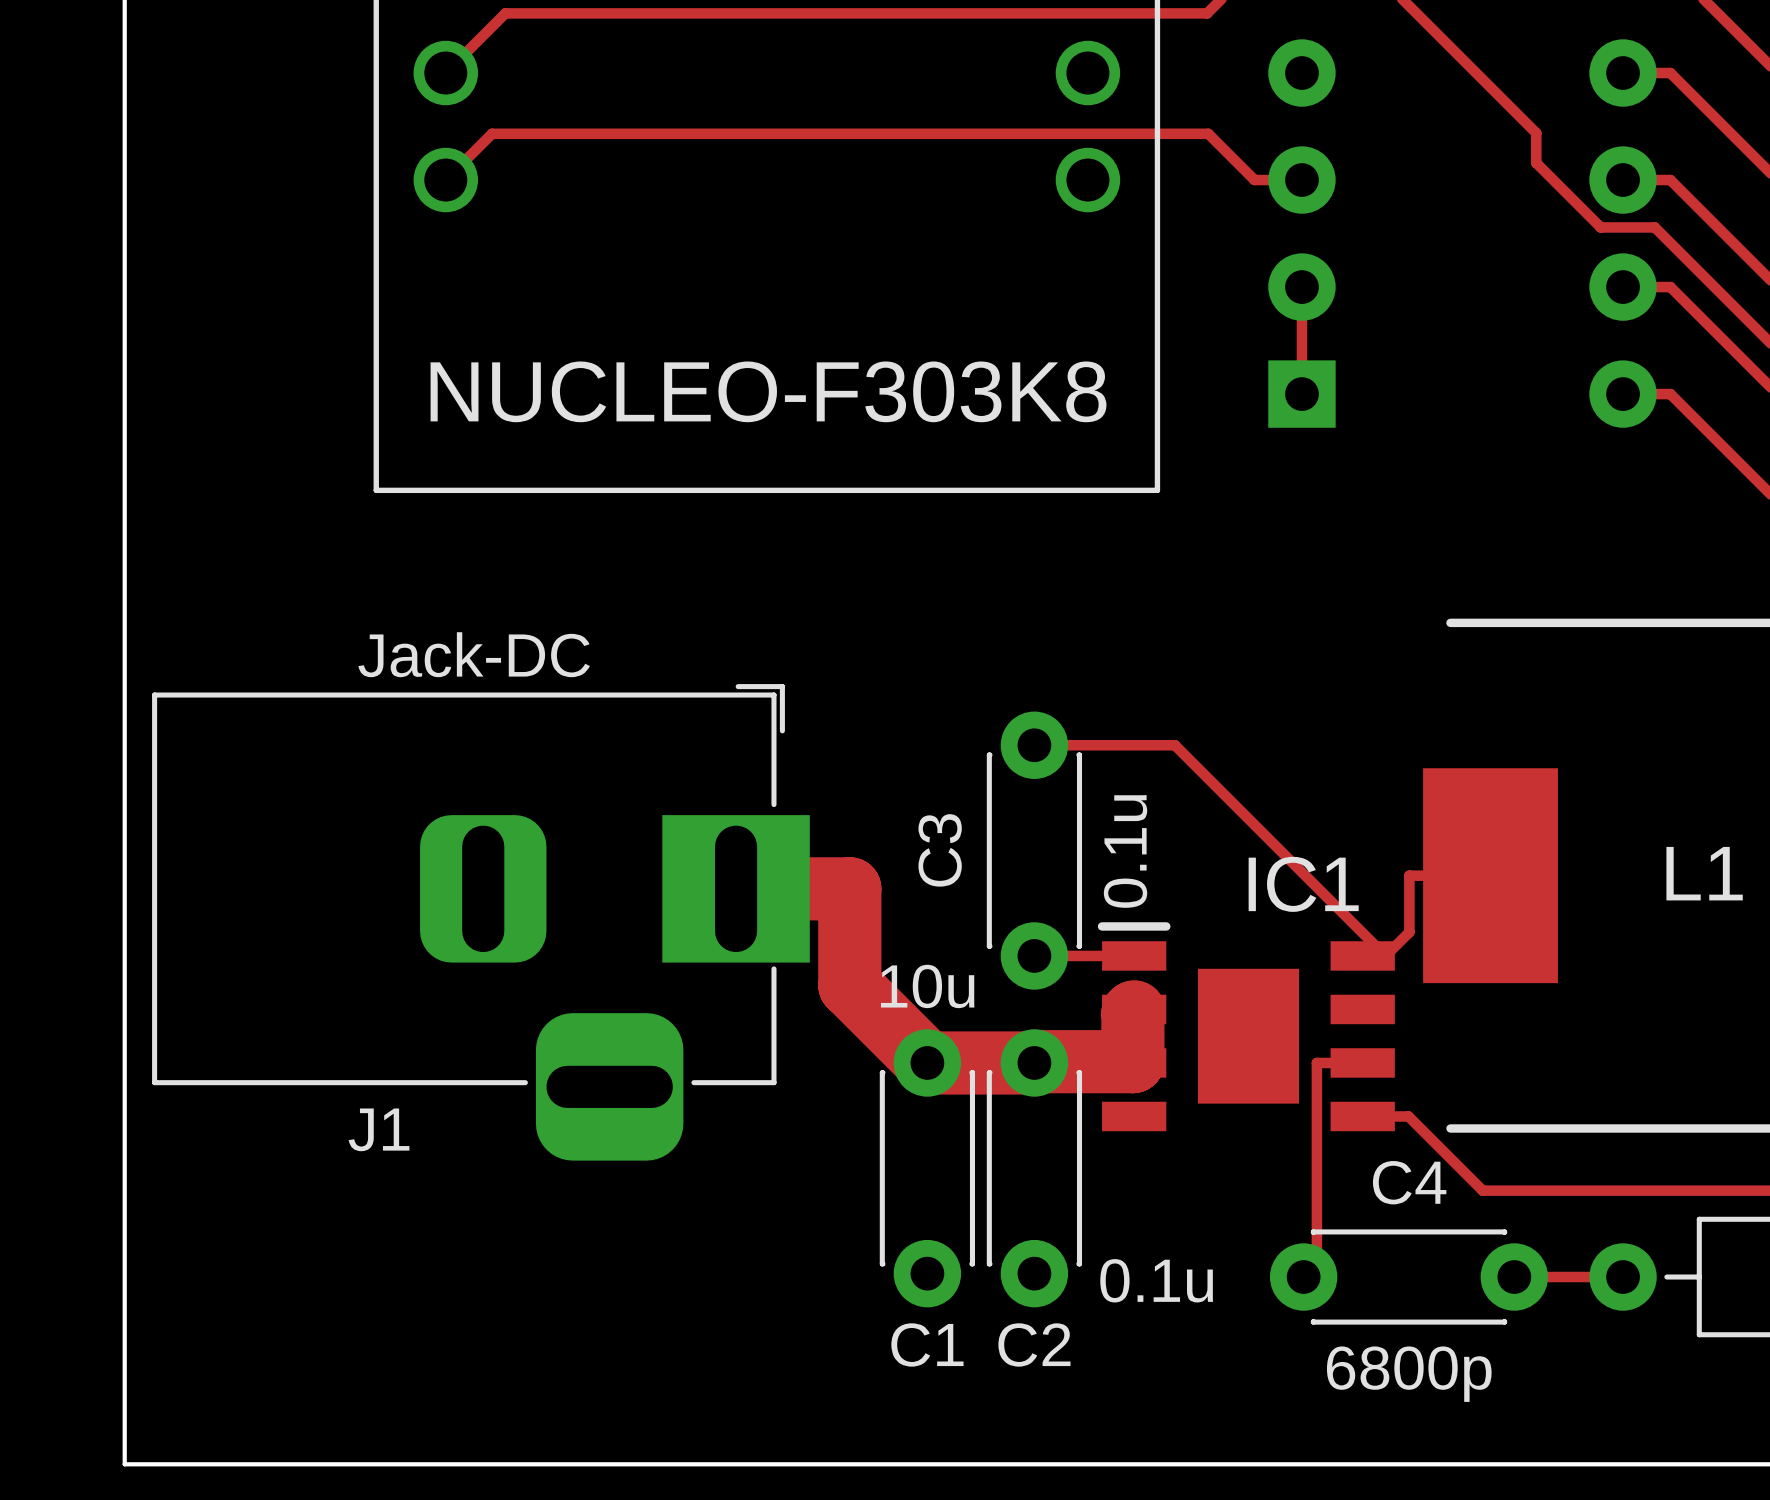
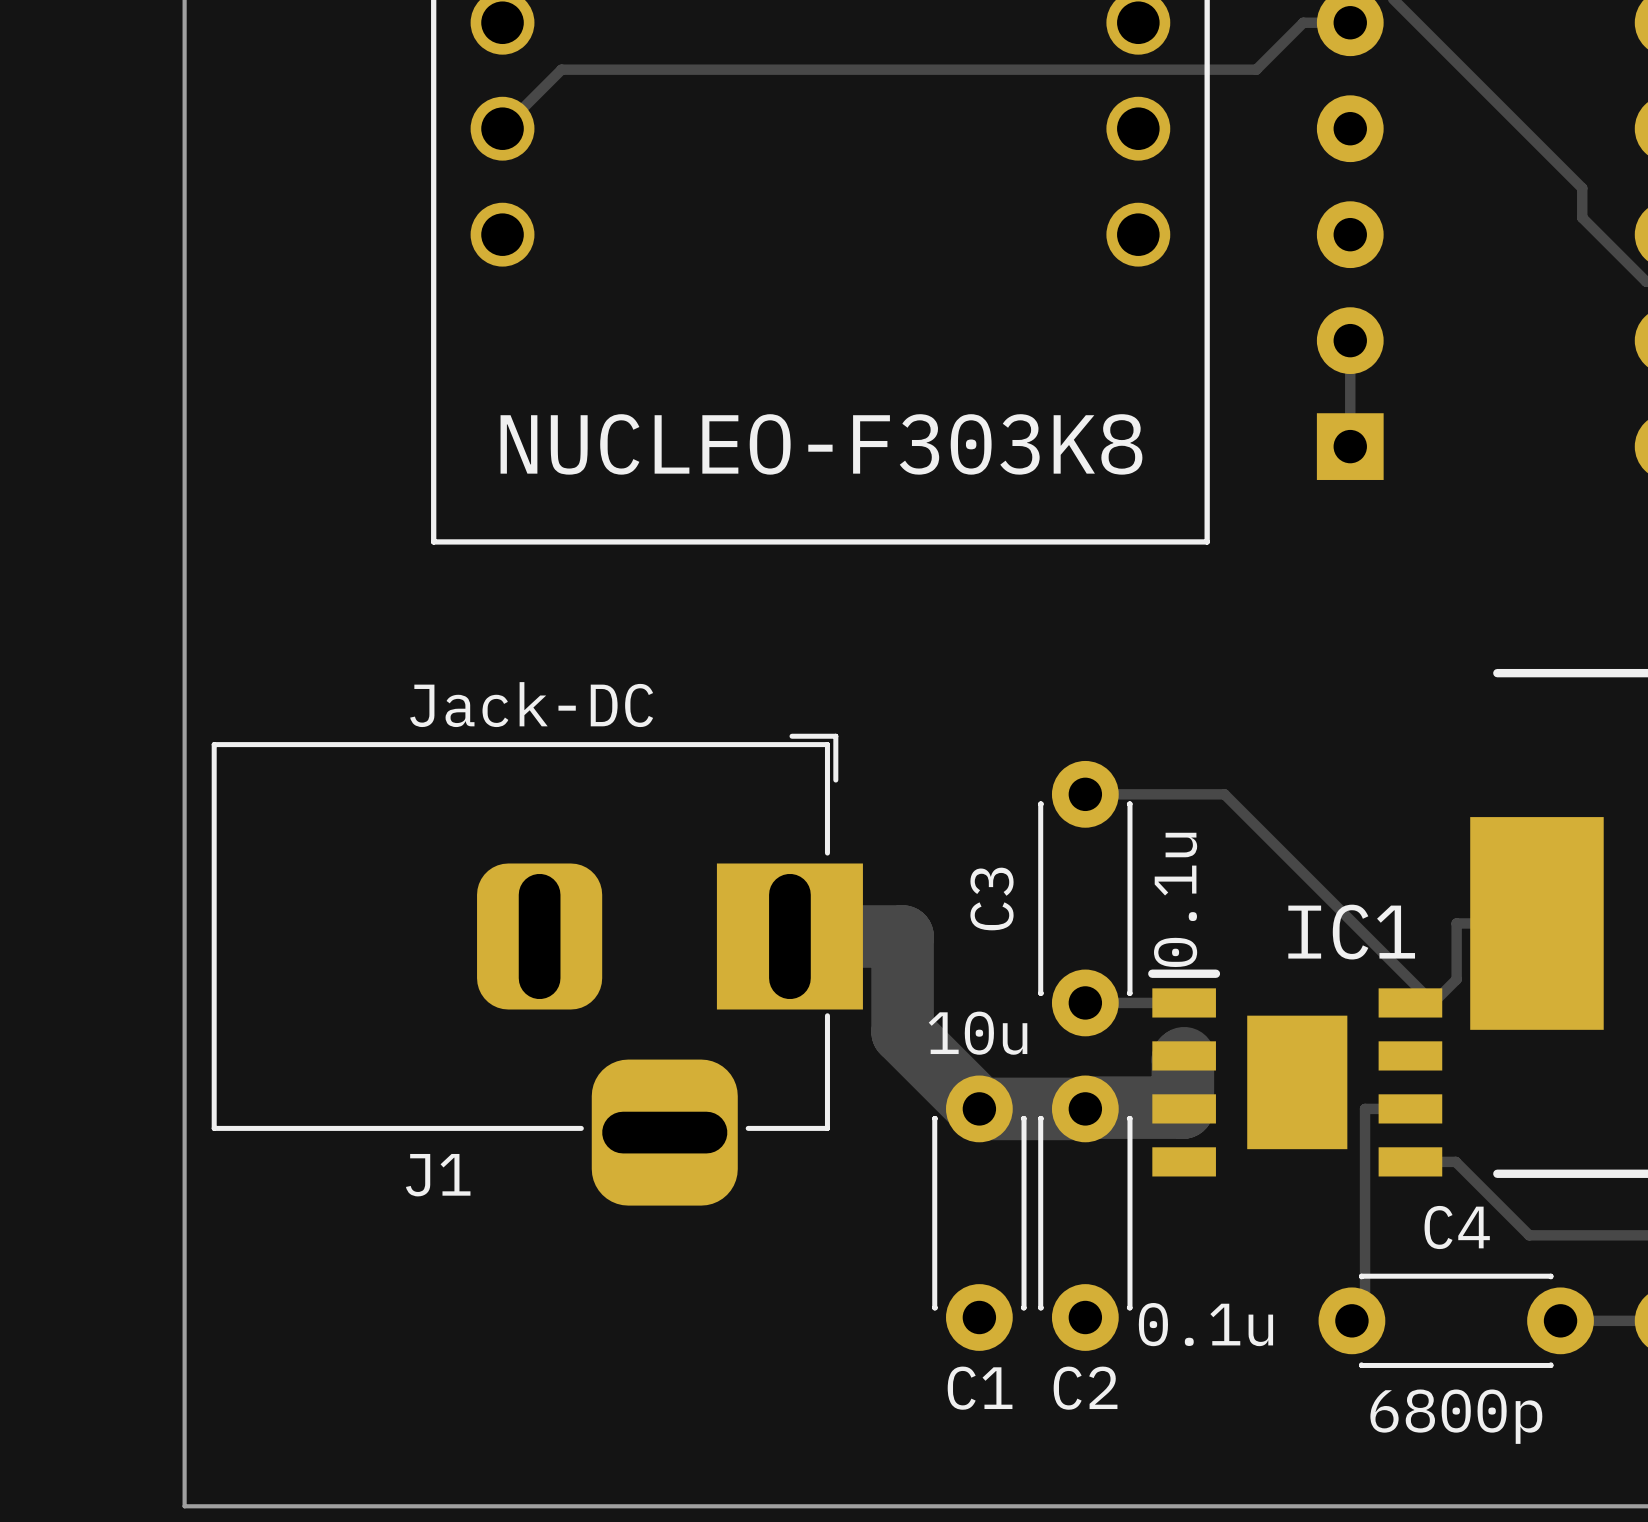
track: (445, 180) (492, 133) (1208, 133) (1254, 180) (1301, 180) -> none

